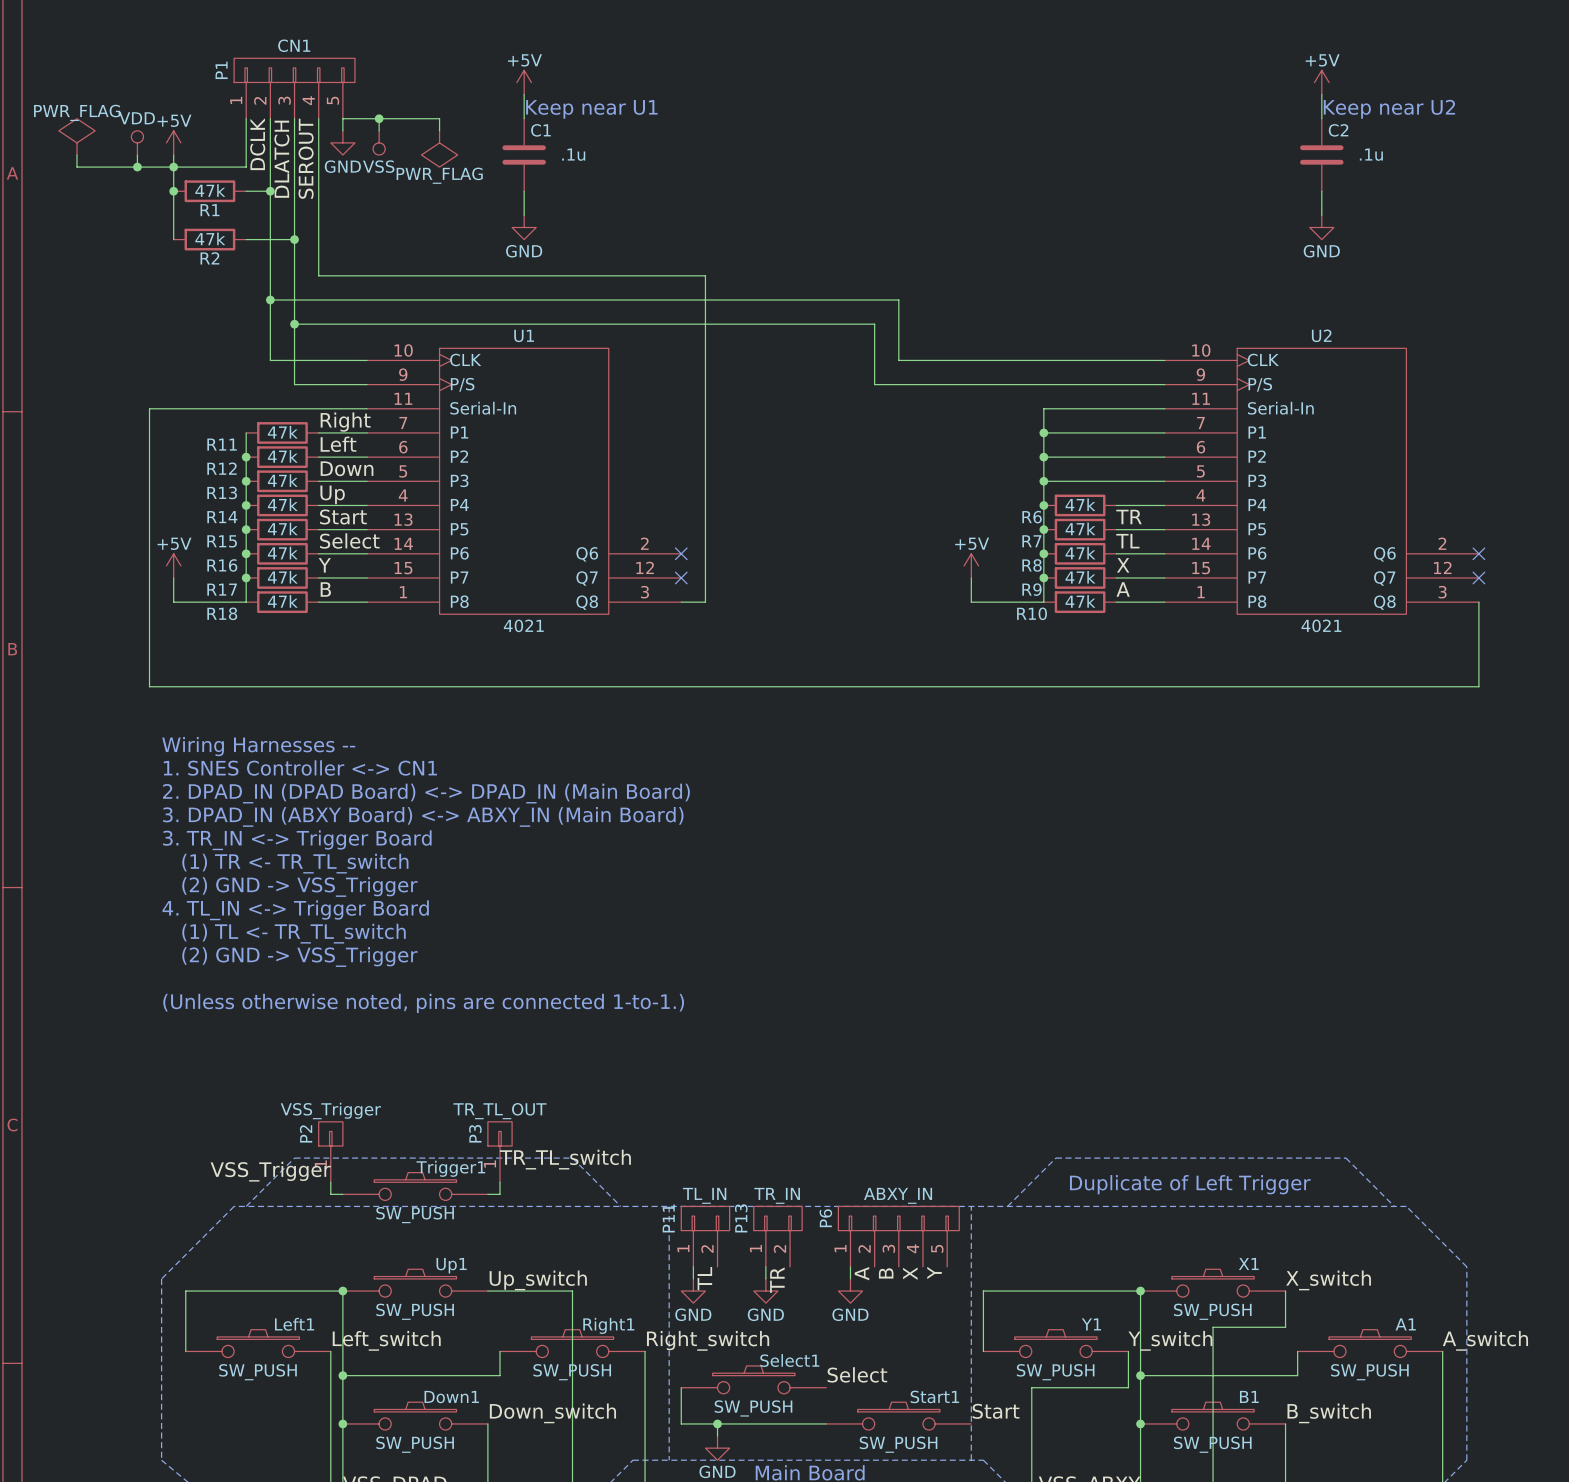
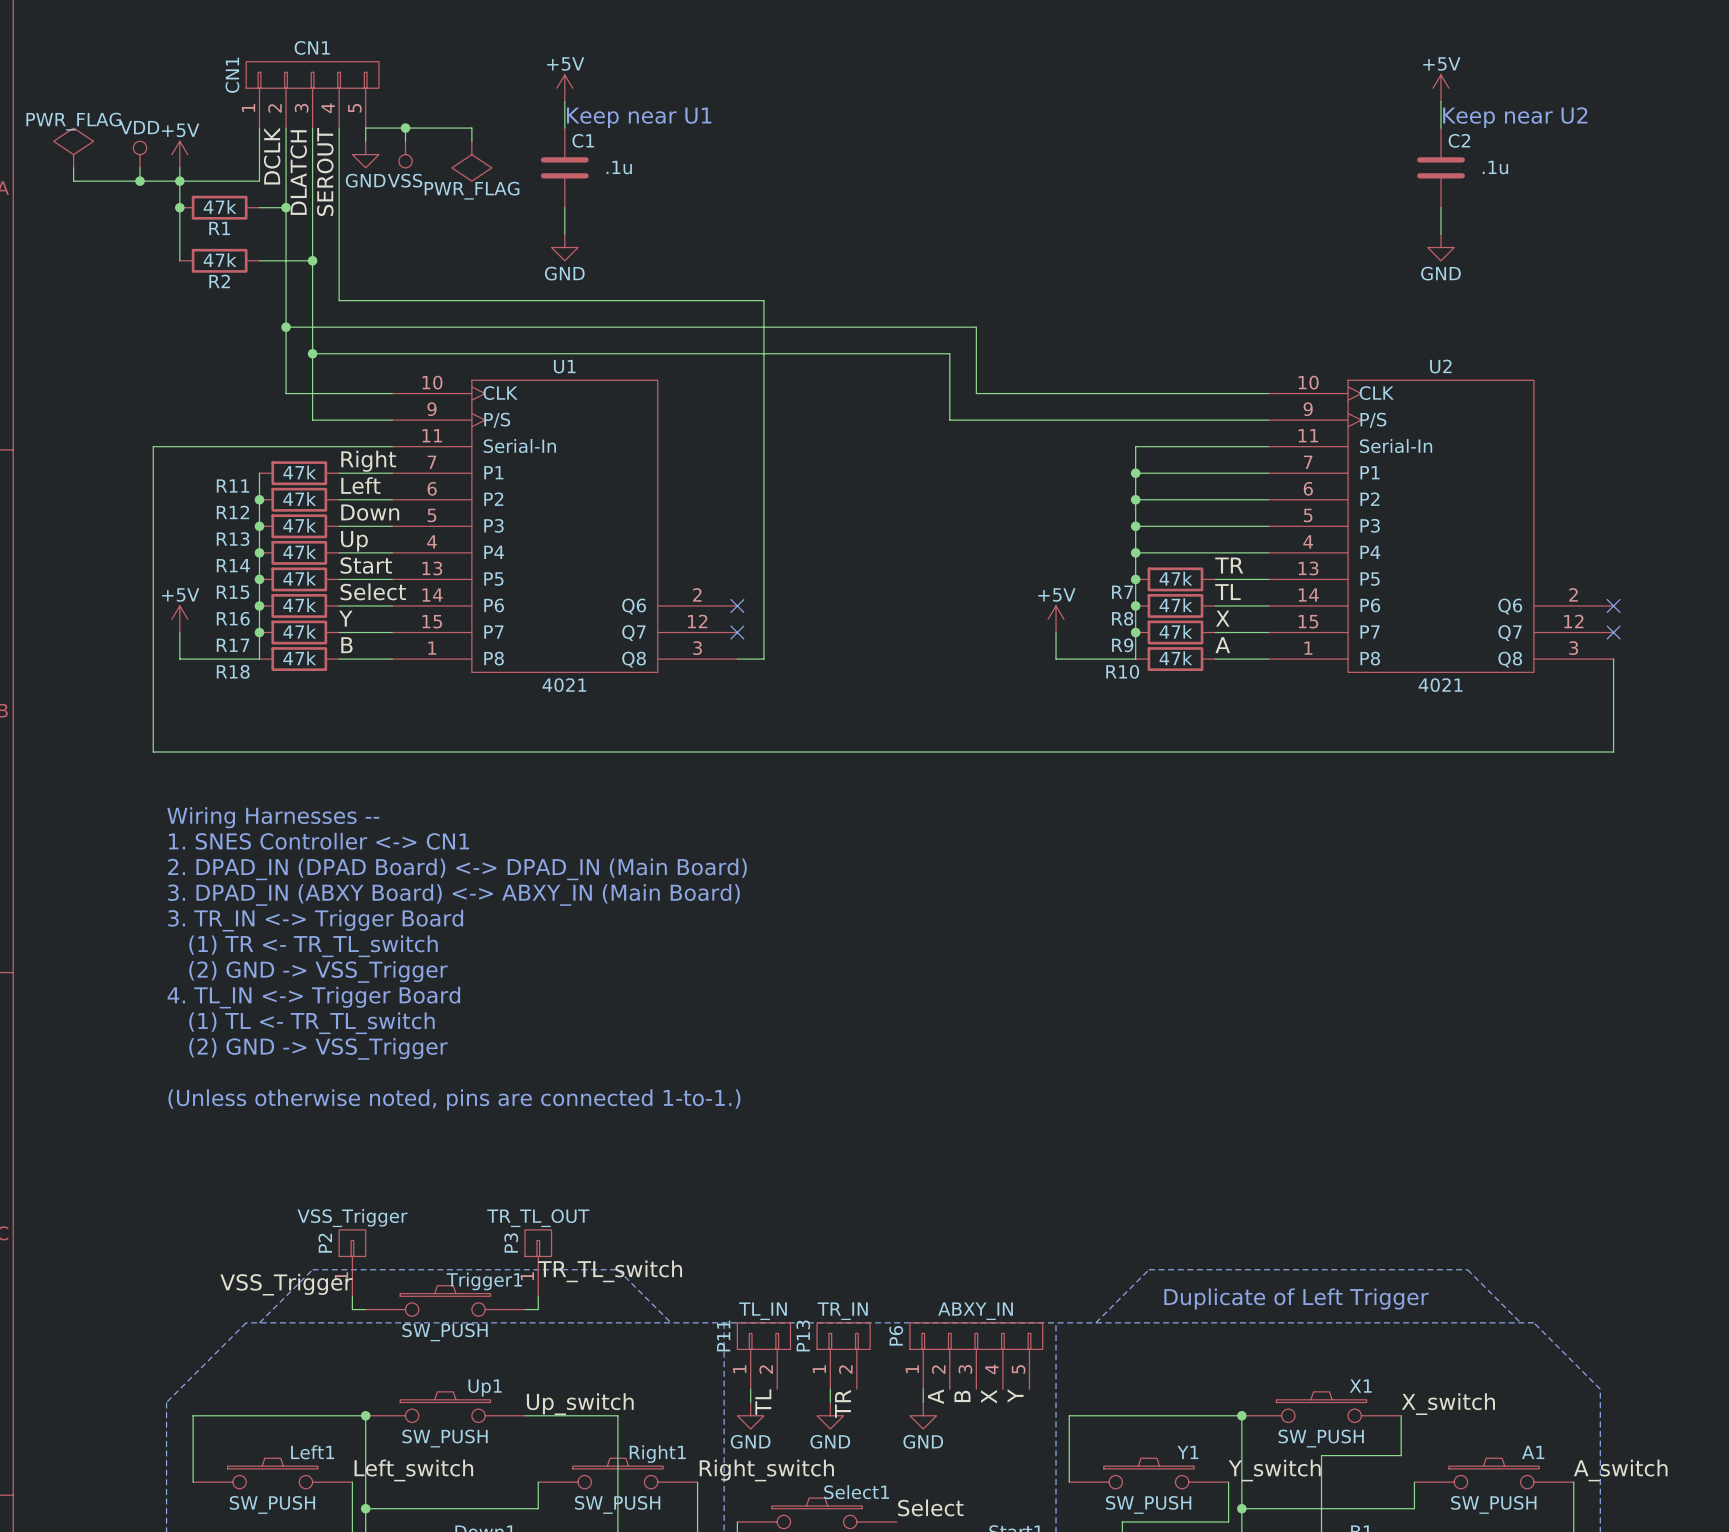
P1 name: P1 (221, 70) -> CN1 (232, 75)
wire: none -> (1135, 552) (1215, 552)
R6: 47k (1080, 505) -> none

